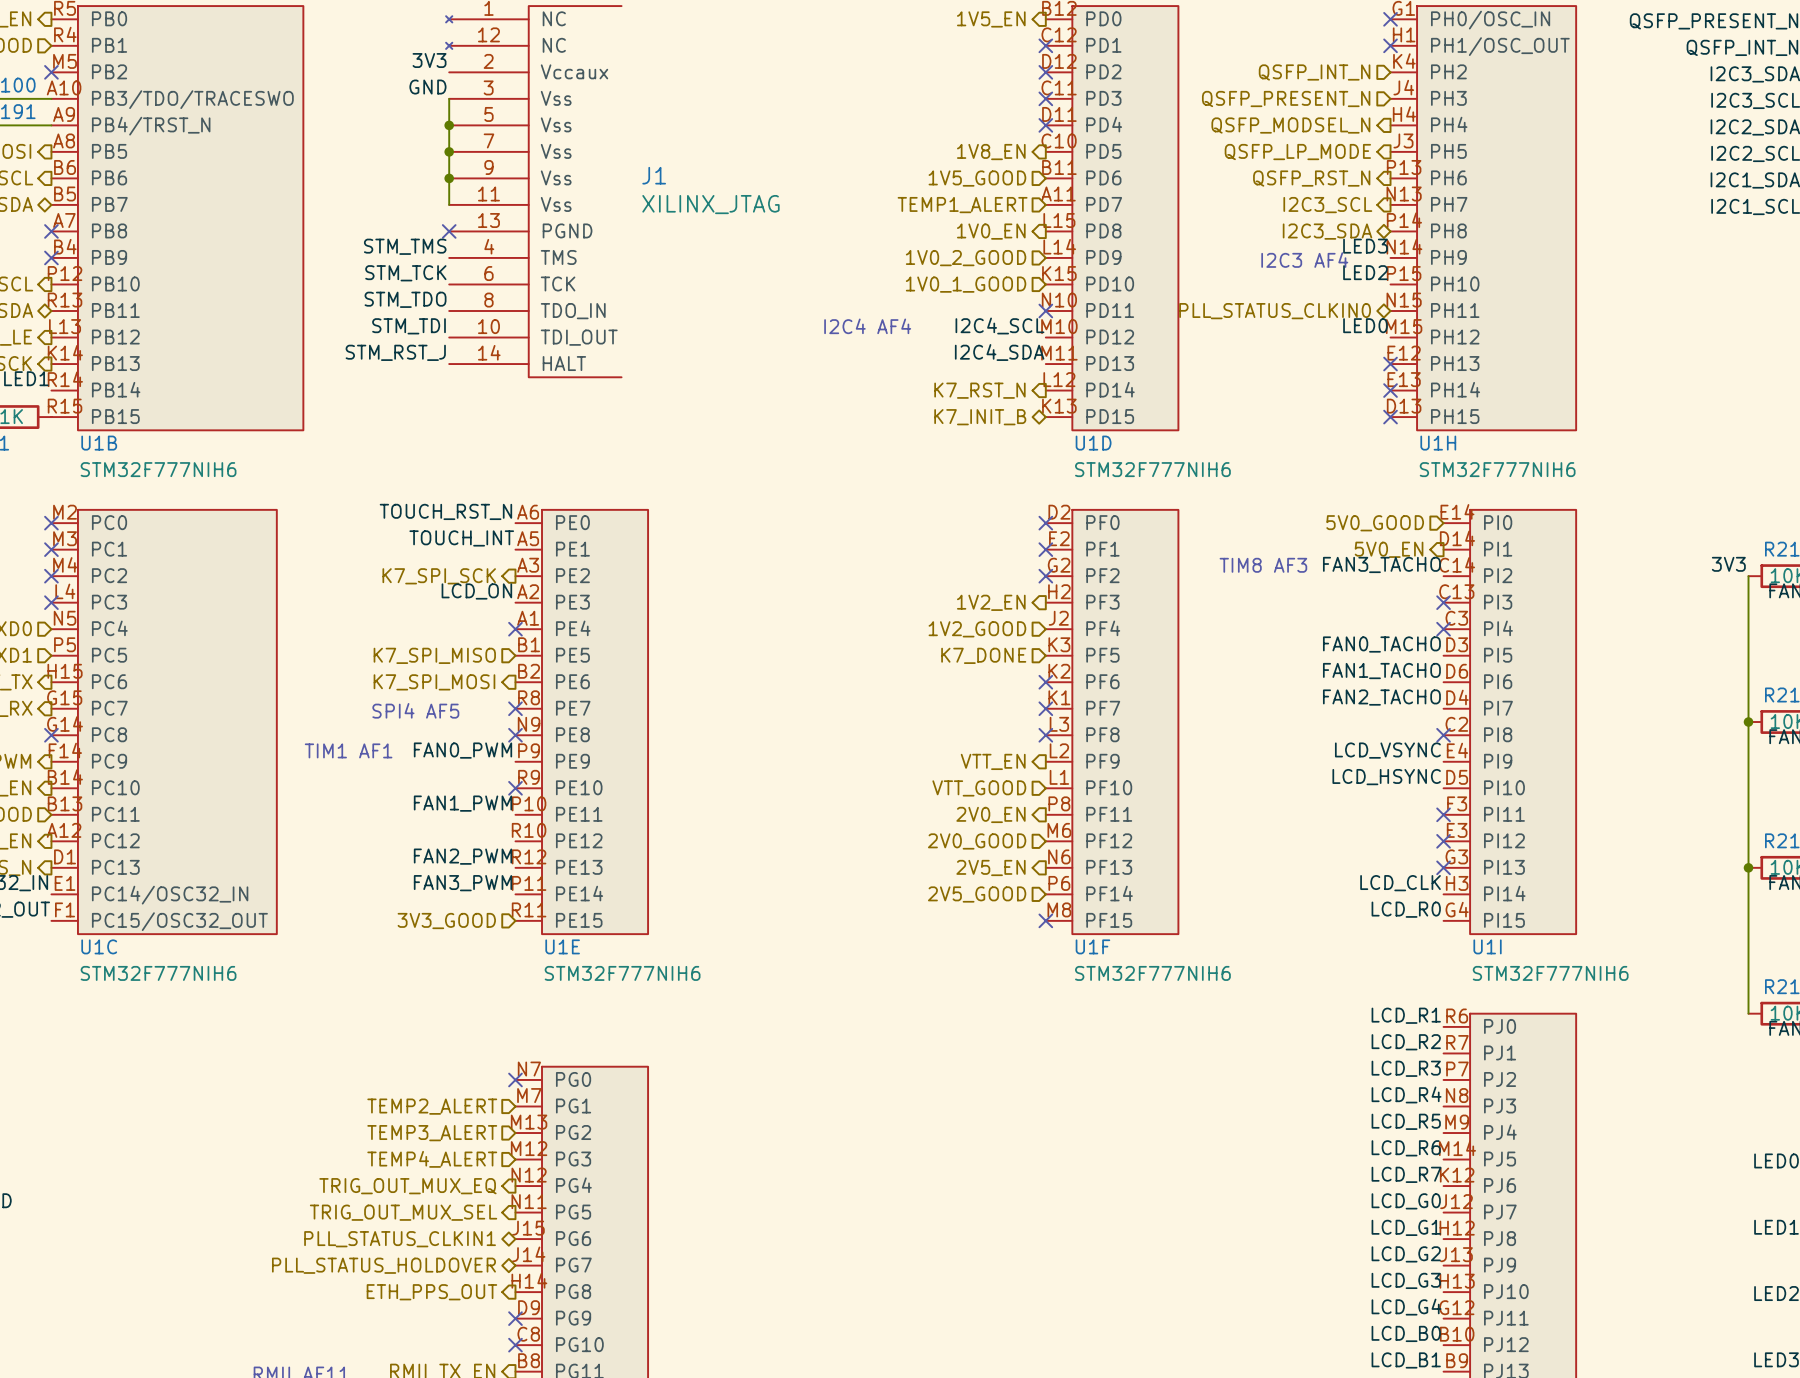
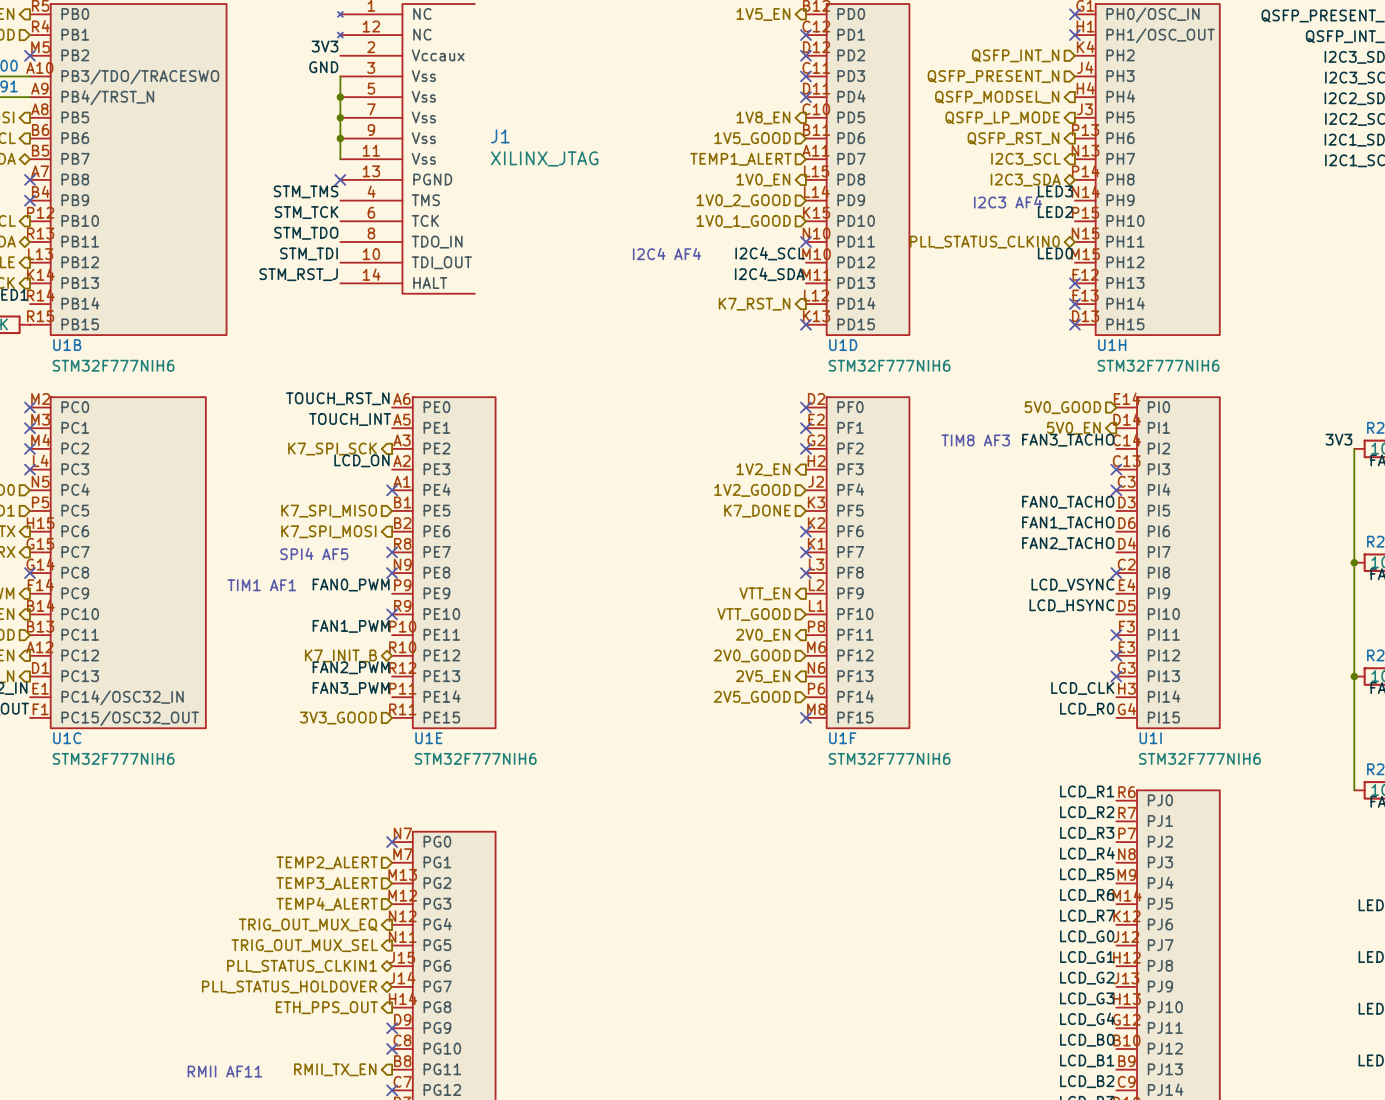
hierarchical label: K7_INIT_B (980, 417) -> none
no-connect mark: none -> (805, 324)
hierarchical label: none -> K7_INIT_B (340, 655)

